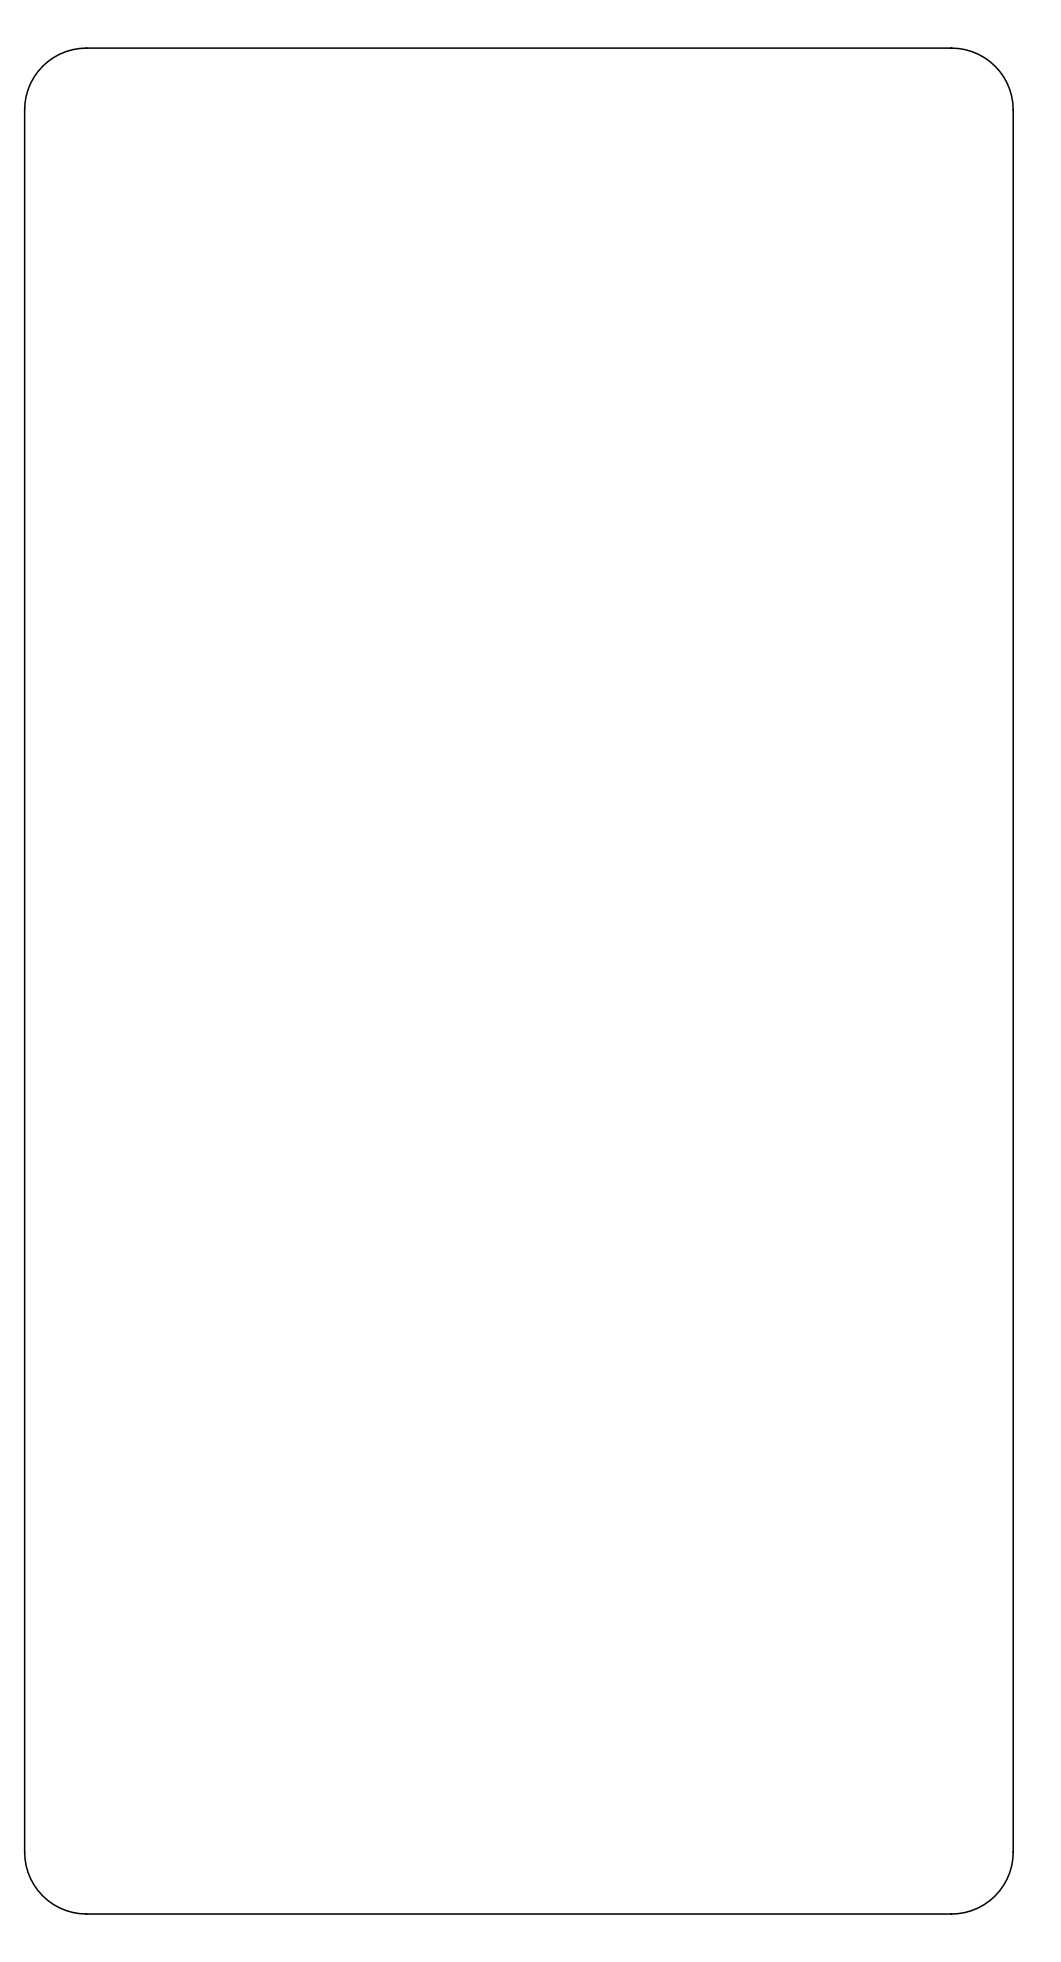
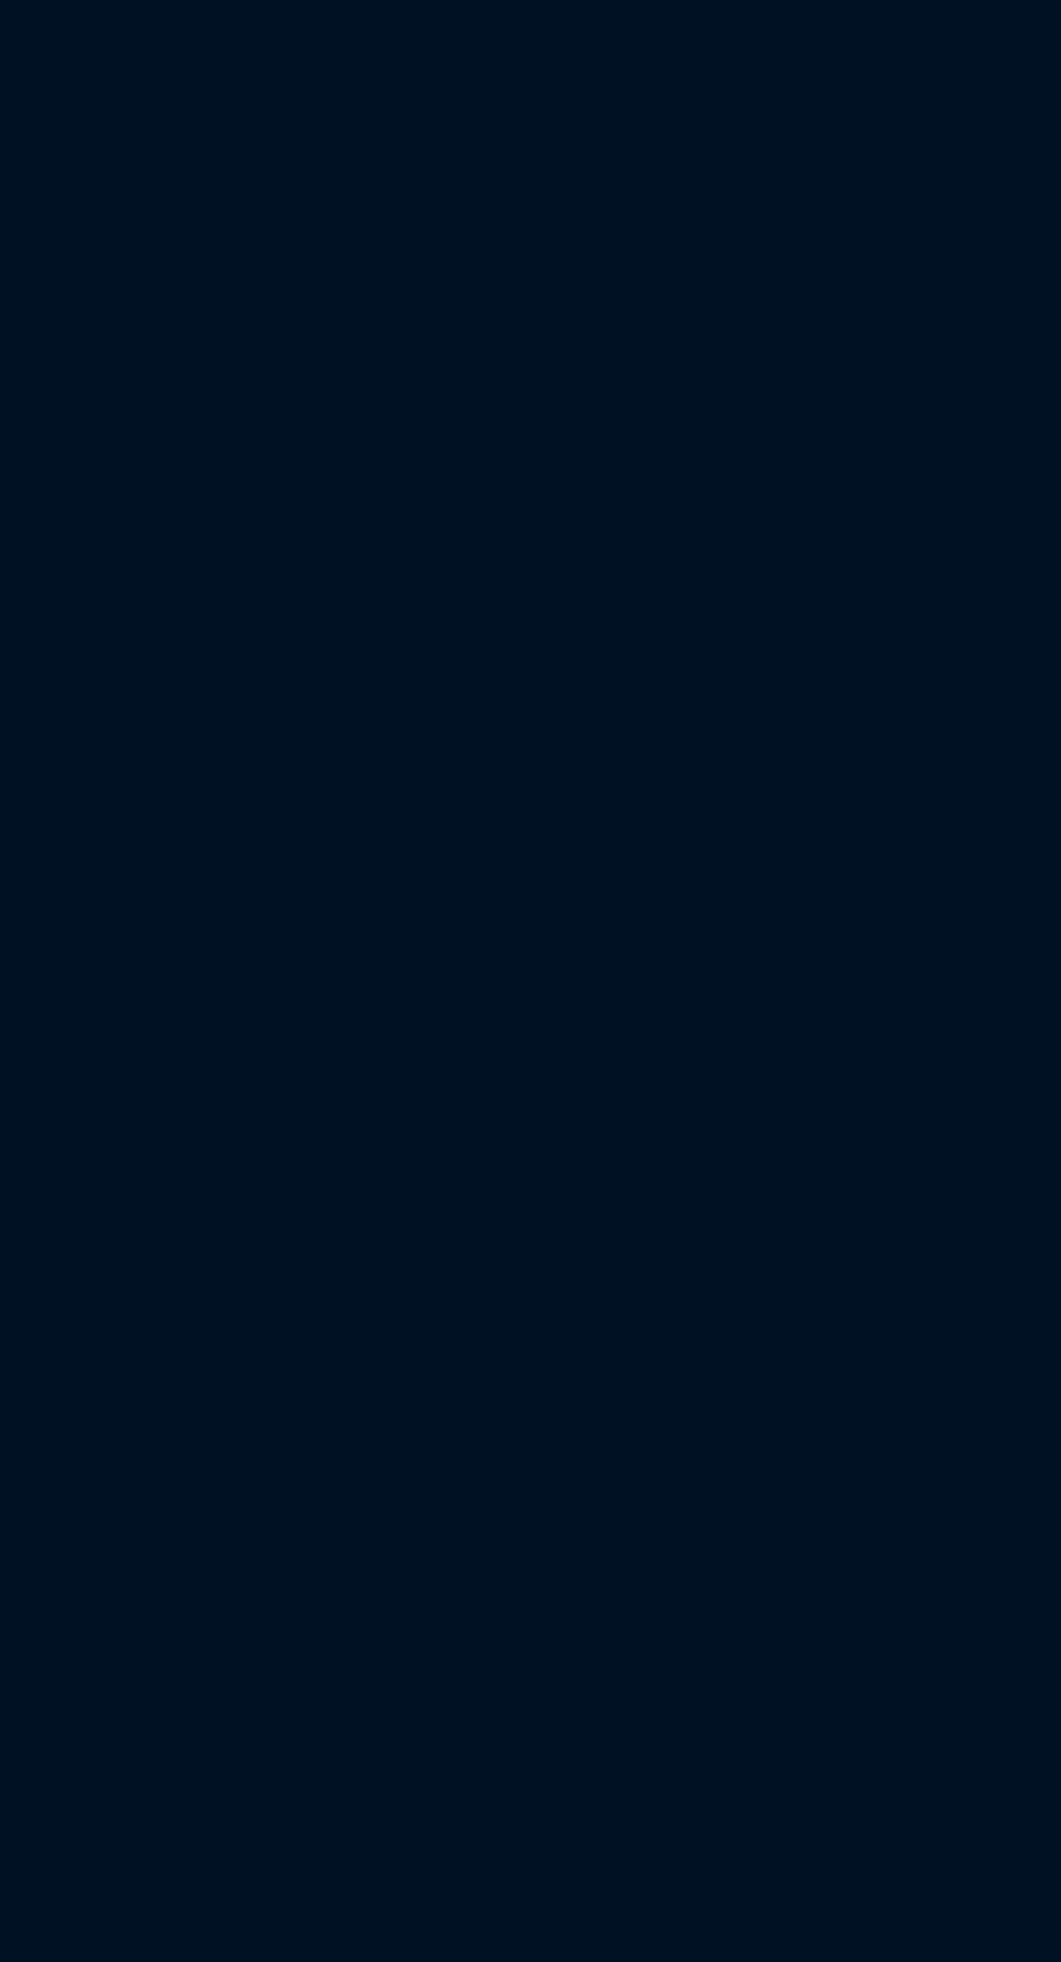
board edge: (86, 48) (951, 48) (971, 51) (984, 57) (999, 71) (1007, 83) (1011, 96) (1013, 109) (1013, 1852) (1009, 1872) (1003, 1885) (995, 1895) (978, 1907) (965, 1912) (951, 1914) (86, 1914) (66, 1910) (53, 1904) (38, 1890) (30, 1879) (26, 1865) (24, 1852) (24, 109) (26, 96) (30, 83) (42, 66) (53, 57) (66, 51) (86, 48) -> none

